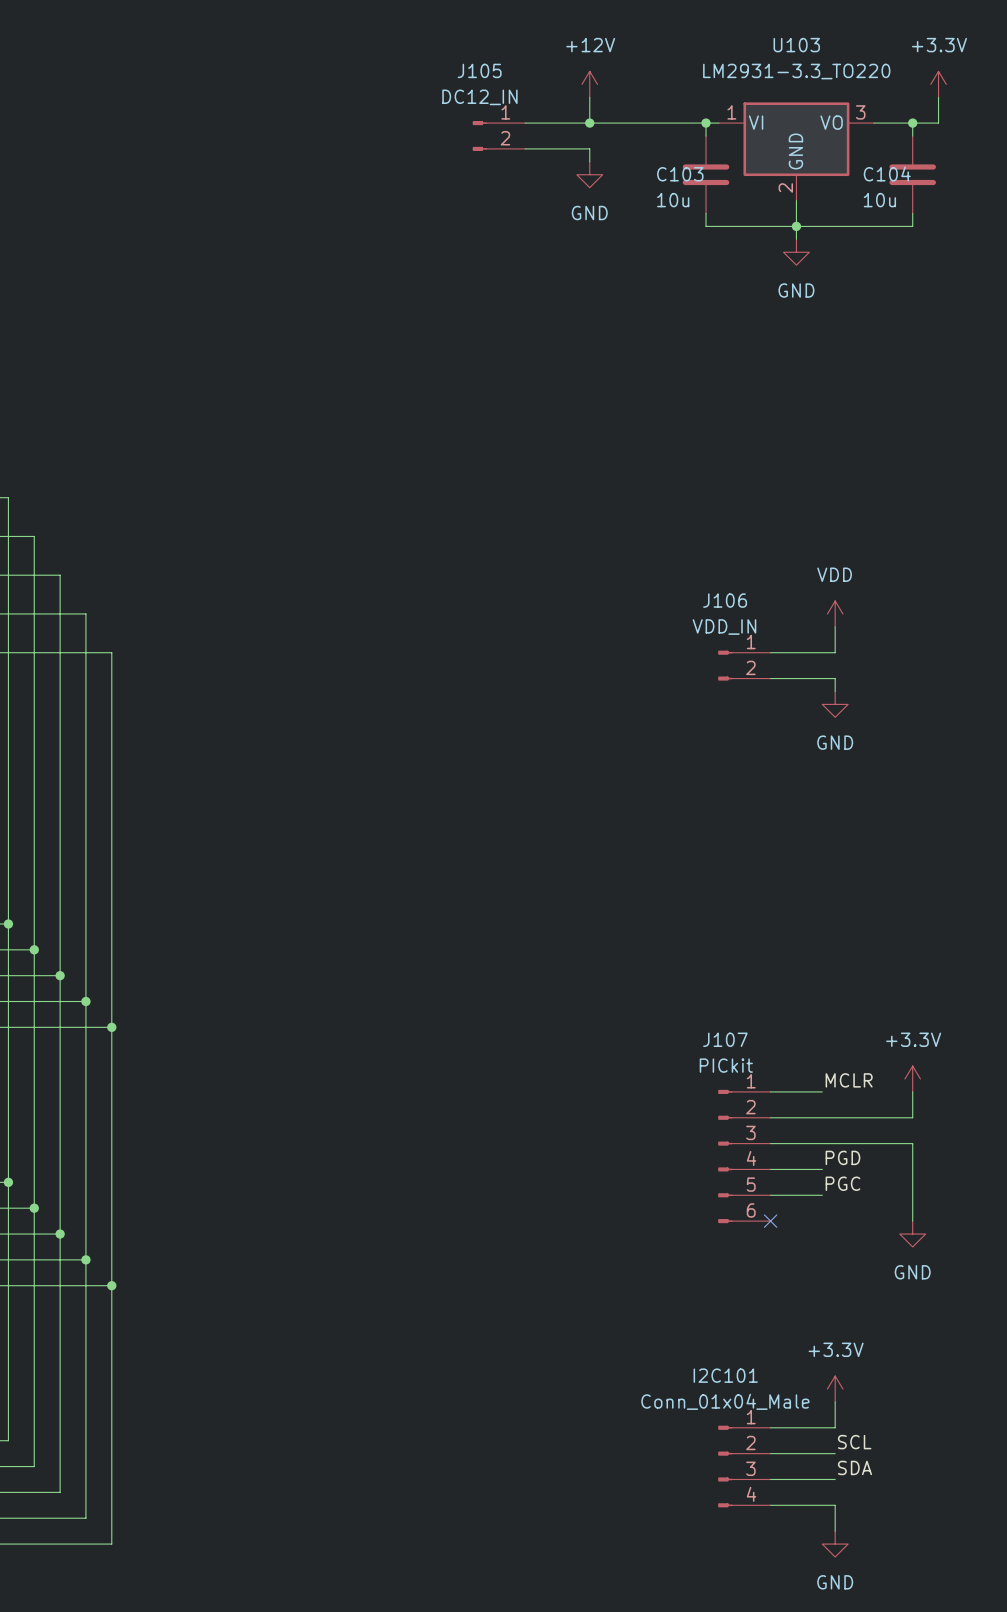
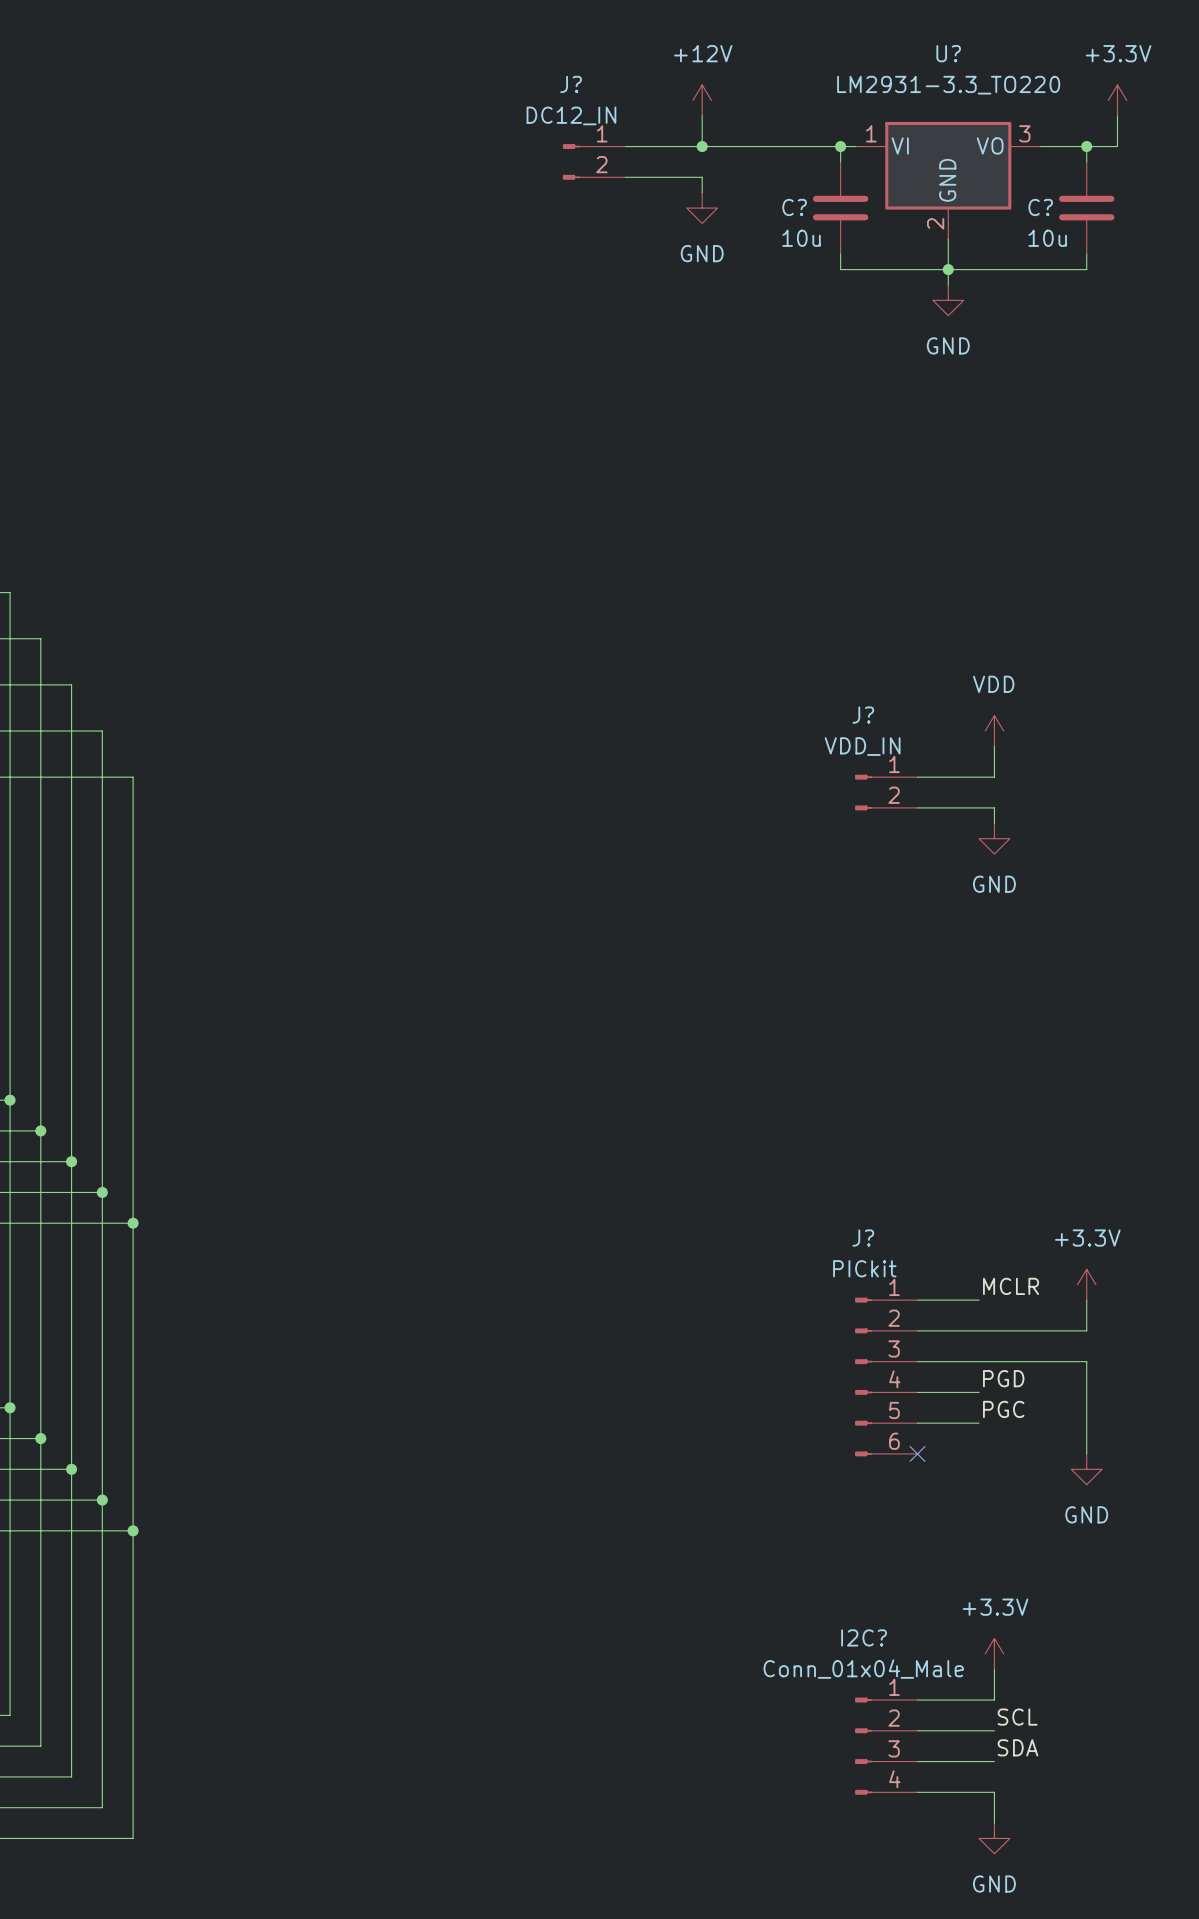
U103 name: U103 (796, 45) -> U? (948, 53)
J105 name: J105 (479, 70) -> J? (571, 84)
C104 name: C104 (887, 173) -> C? (1040, 207)
C103 name: C103 (680, 174) -> C? (794, 207)
J106 name: J106 (725, 600) -> J? (863, 715)
J107 name: J107 (725, 1039) -> J? (863, 1238)
I2C101 name: I2C101 (725, 1375) -> I2C? (864, 1637)

